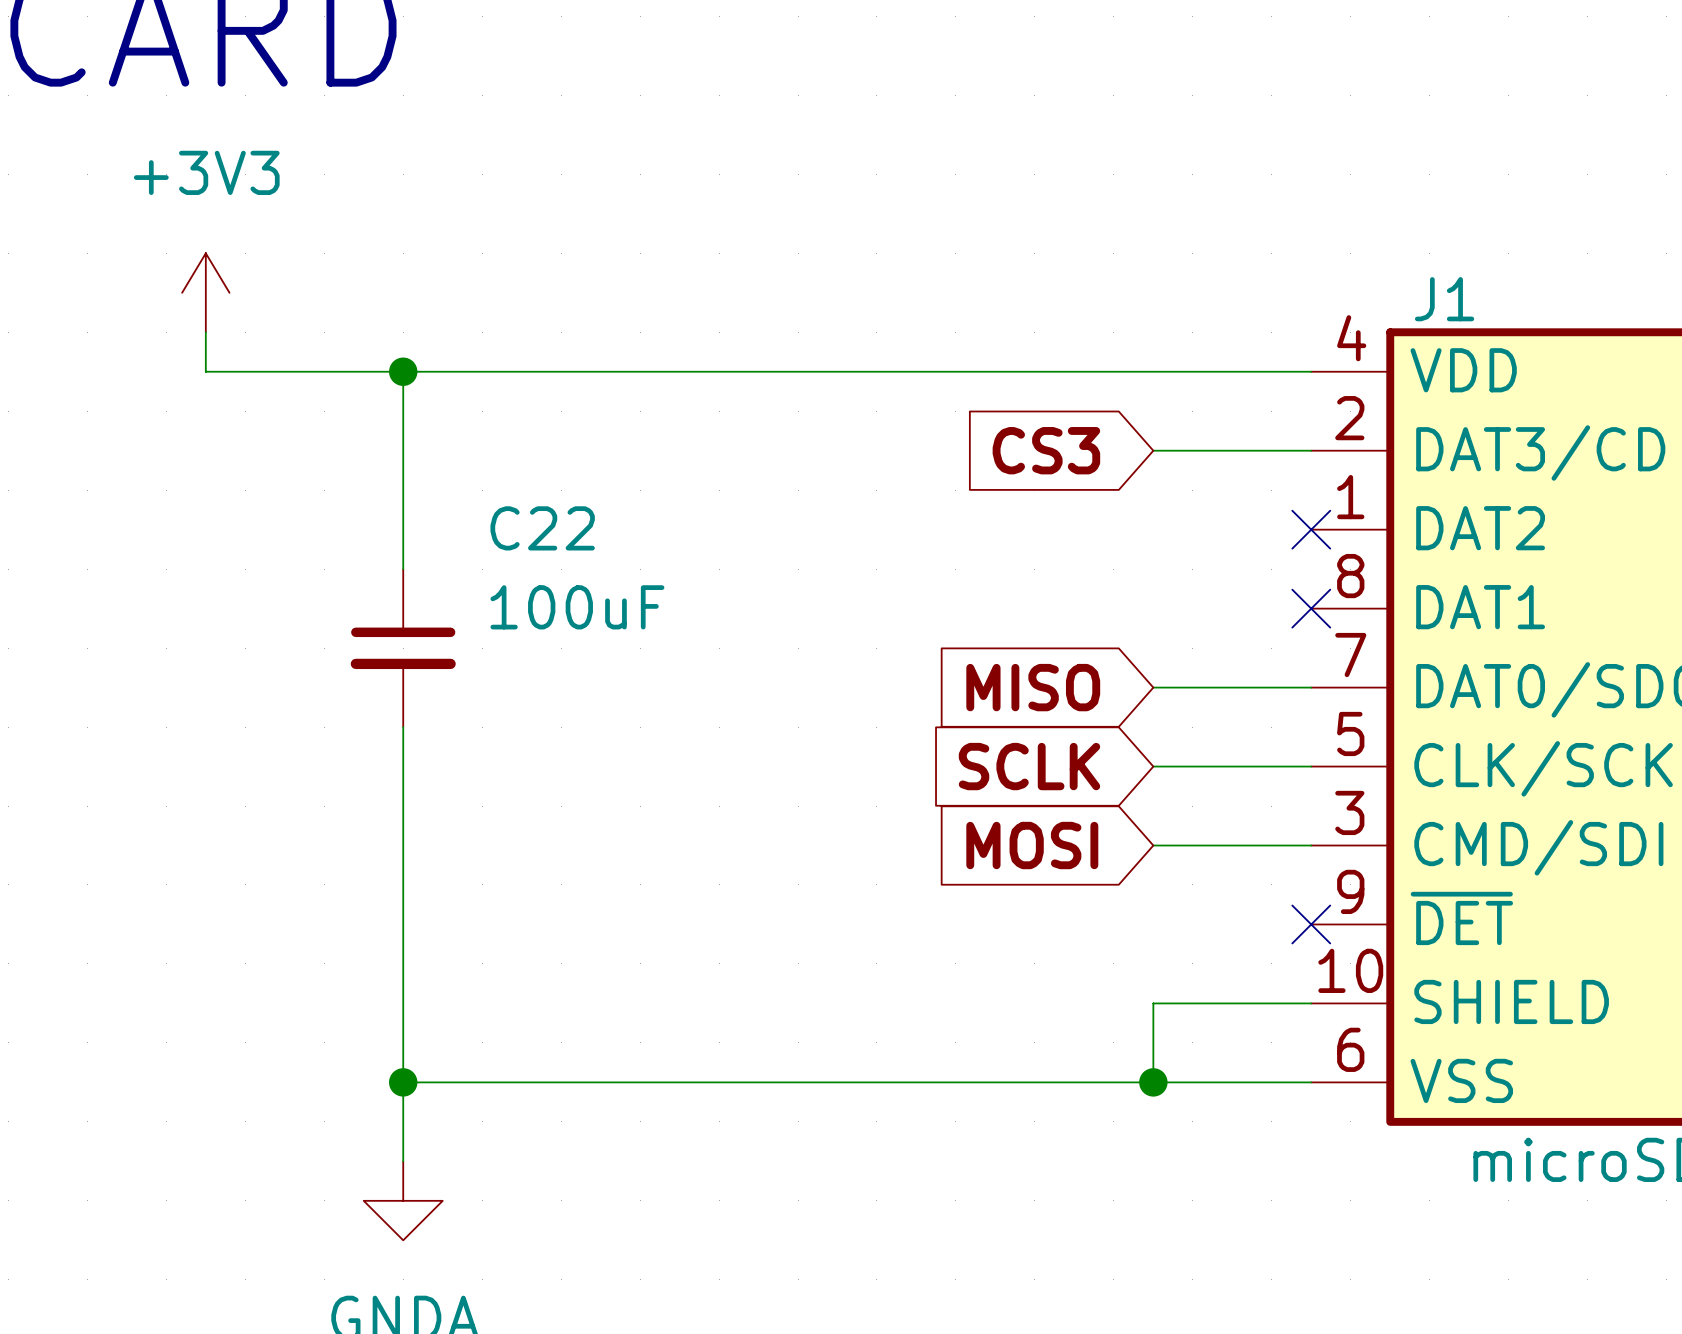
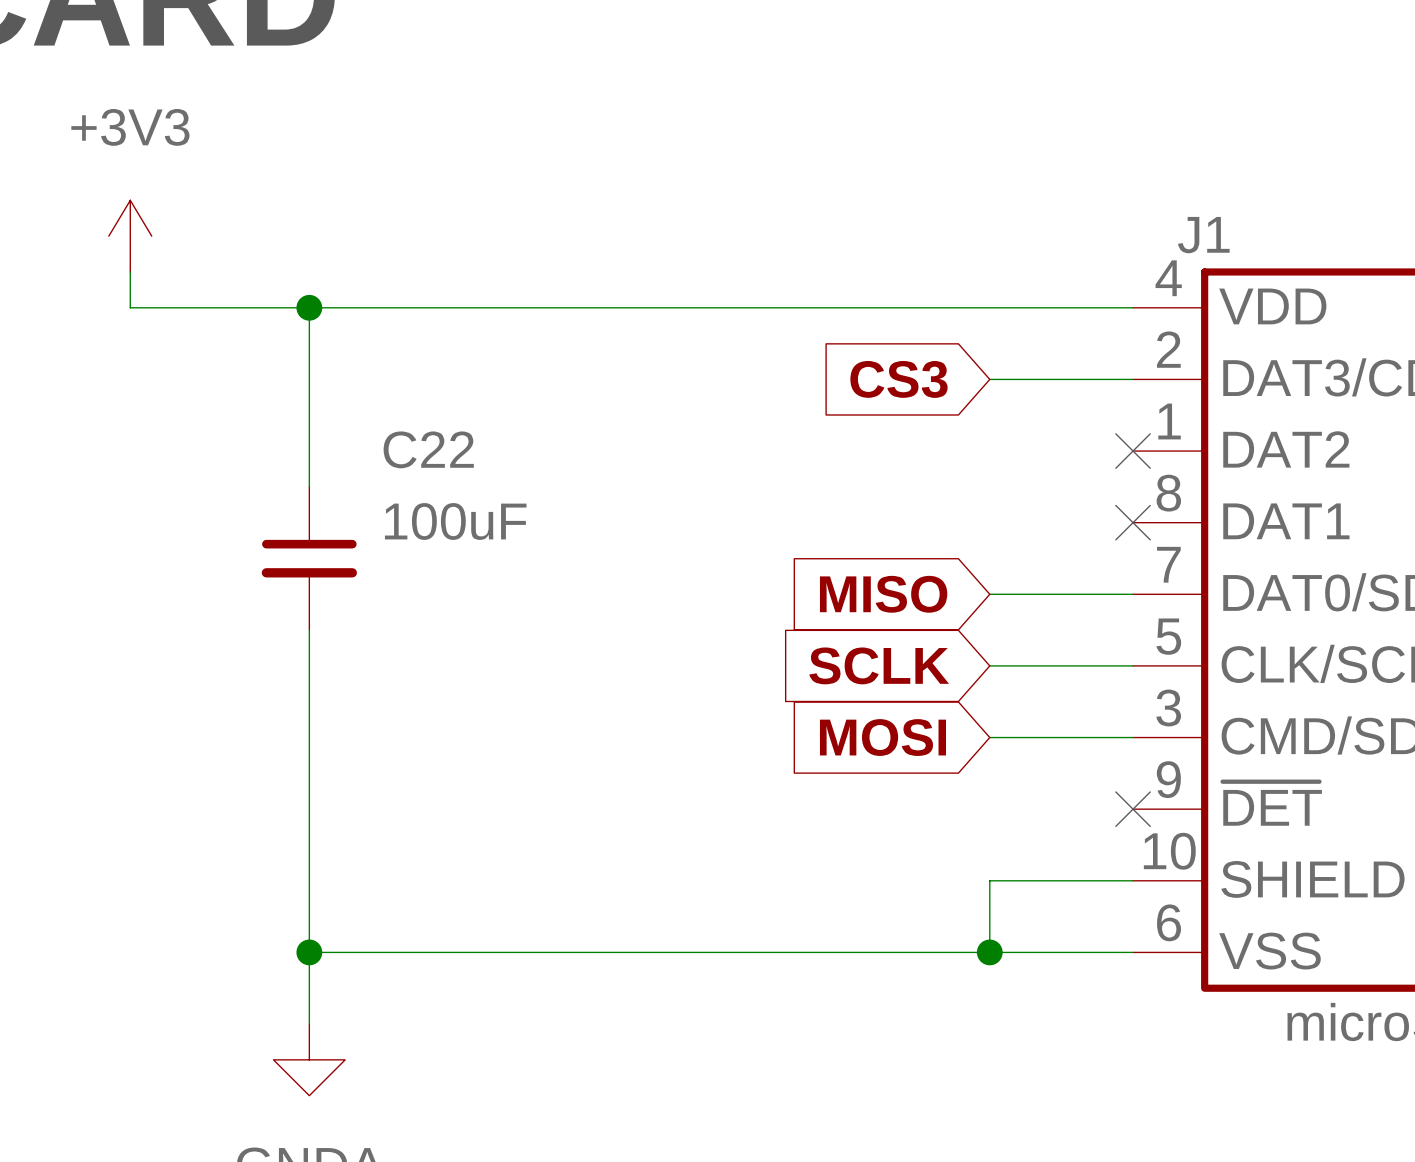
J1 name position: J1 (1444, 299) -> J1 (1203, 235)

